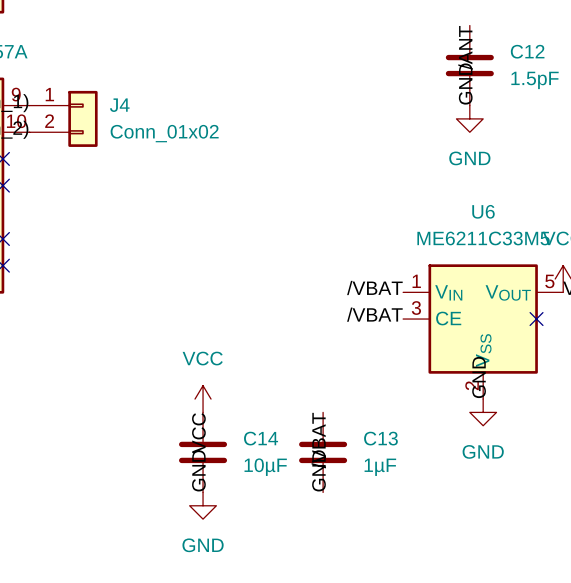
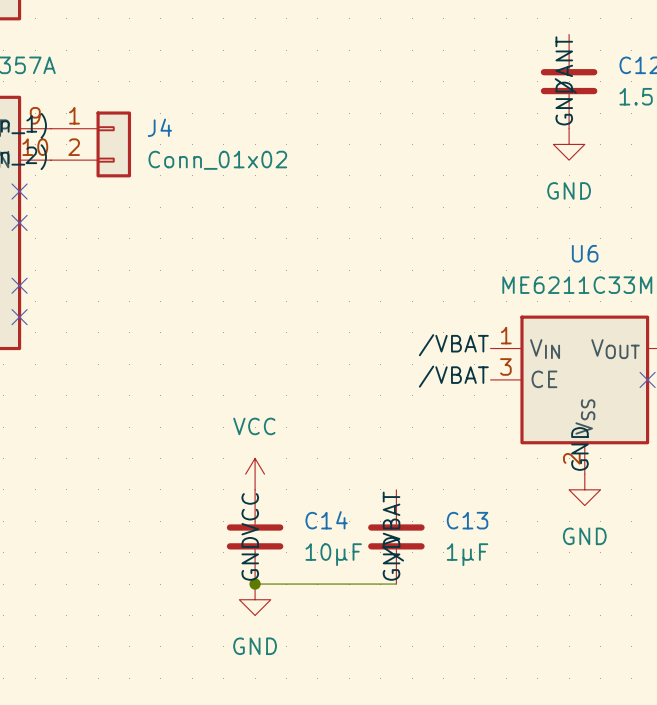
wire: none -> (255, 584) (396, 584)
junction: none -> (255, 584)

